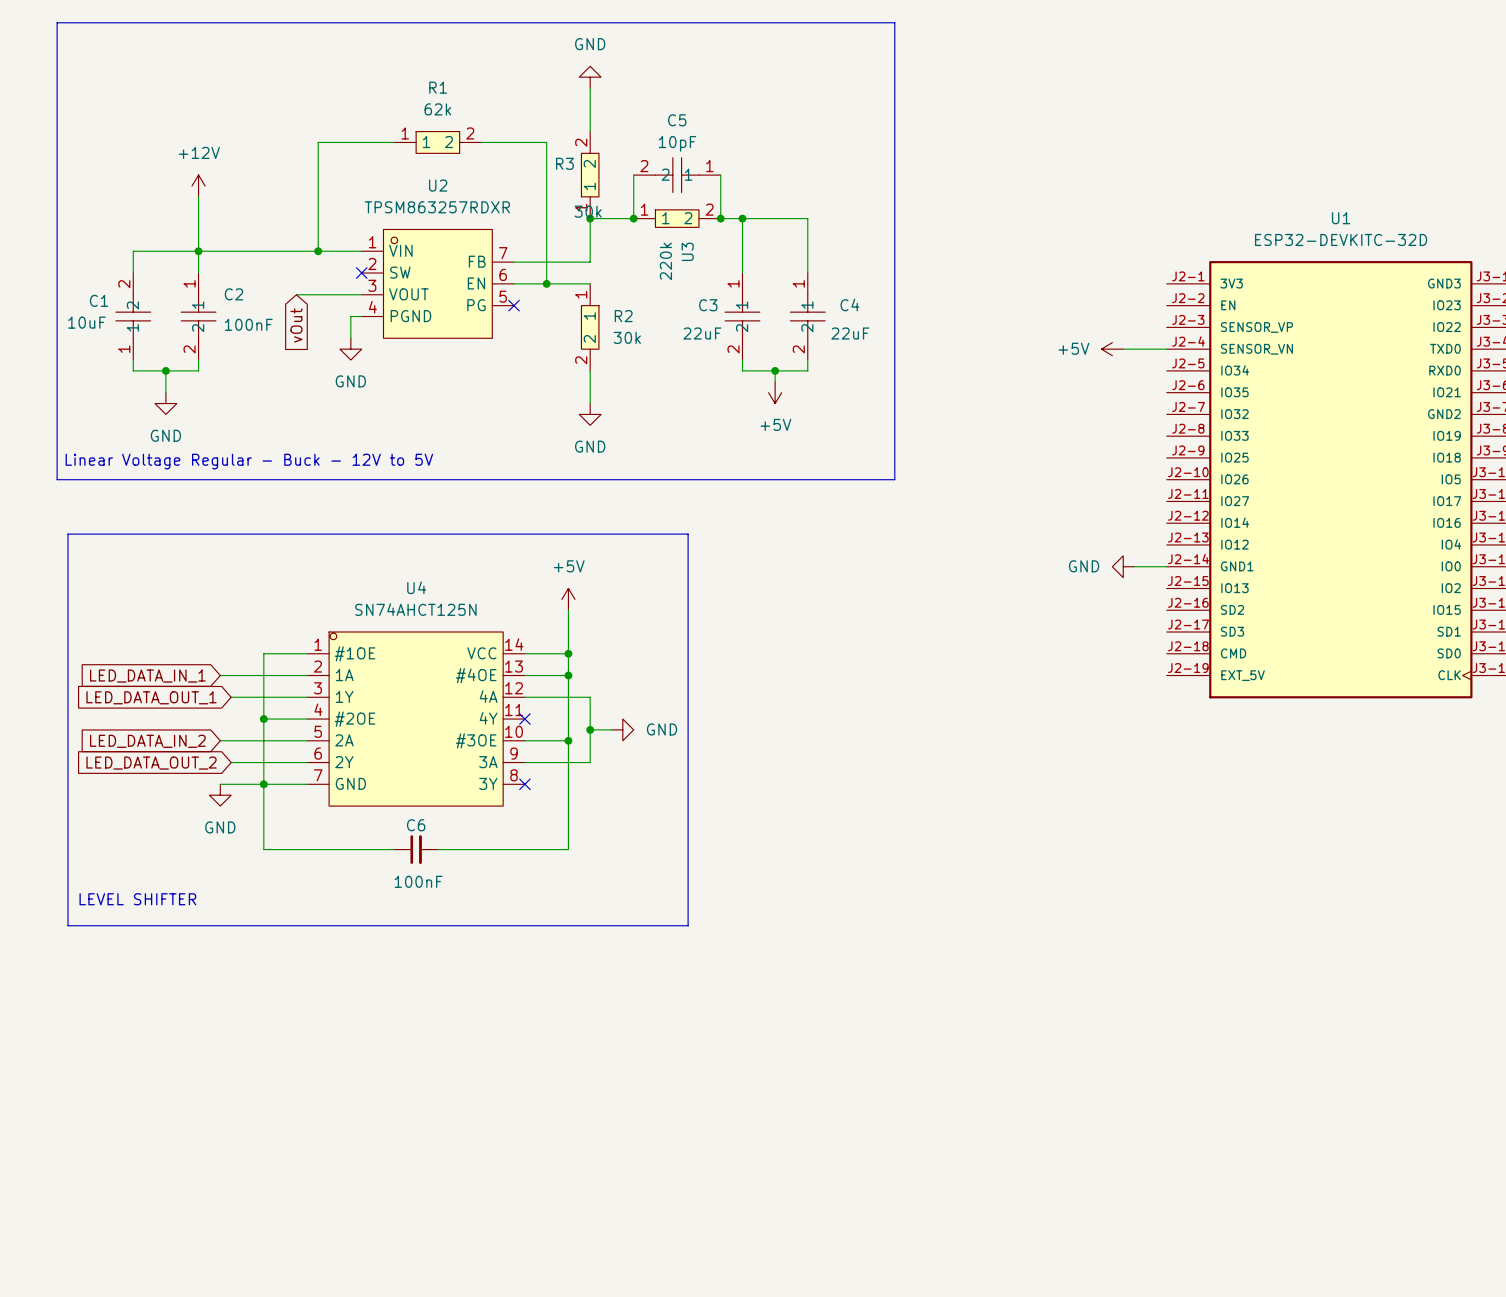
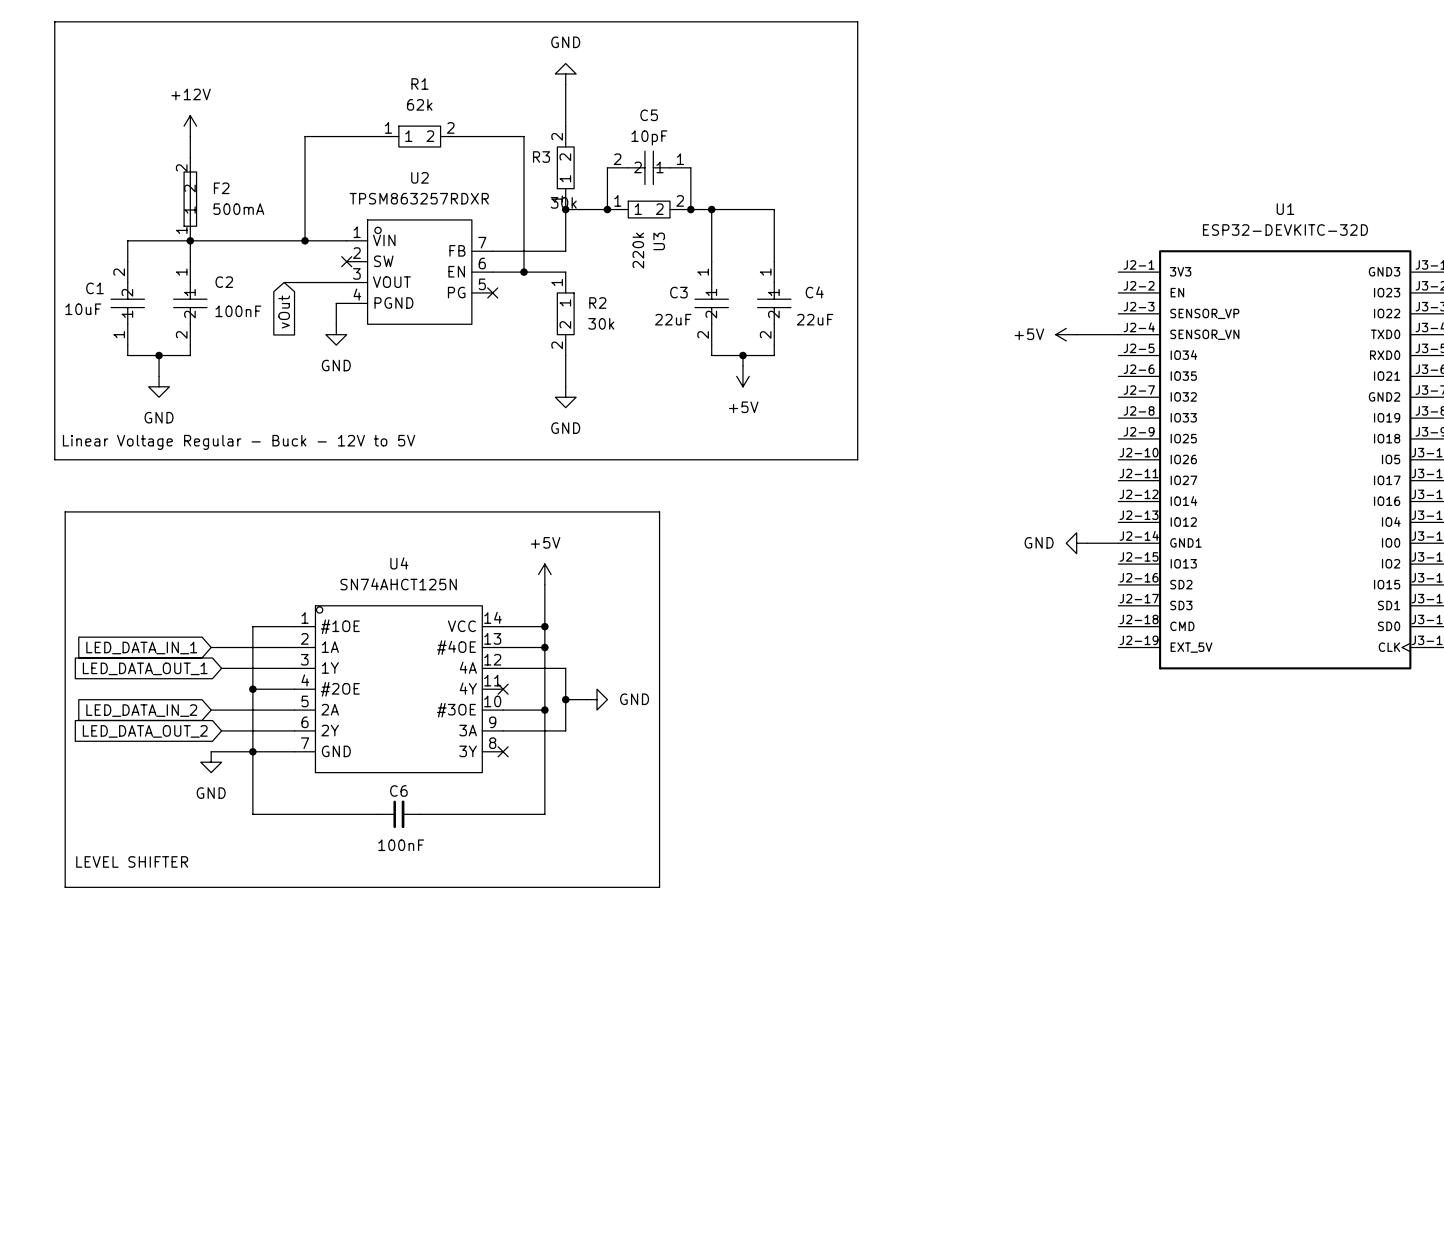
wire: none -> (190, 136) (190, 157)
power symbol position: +12V (198, 185) -> +12V (190, 126)
F2: none -> 500mA (190, 199)

